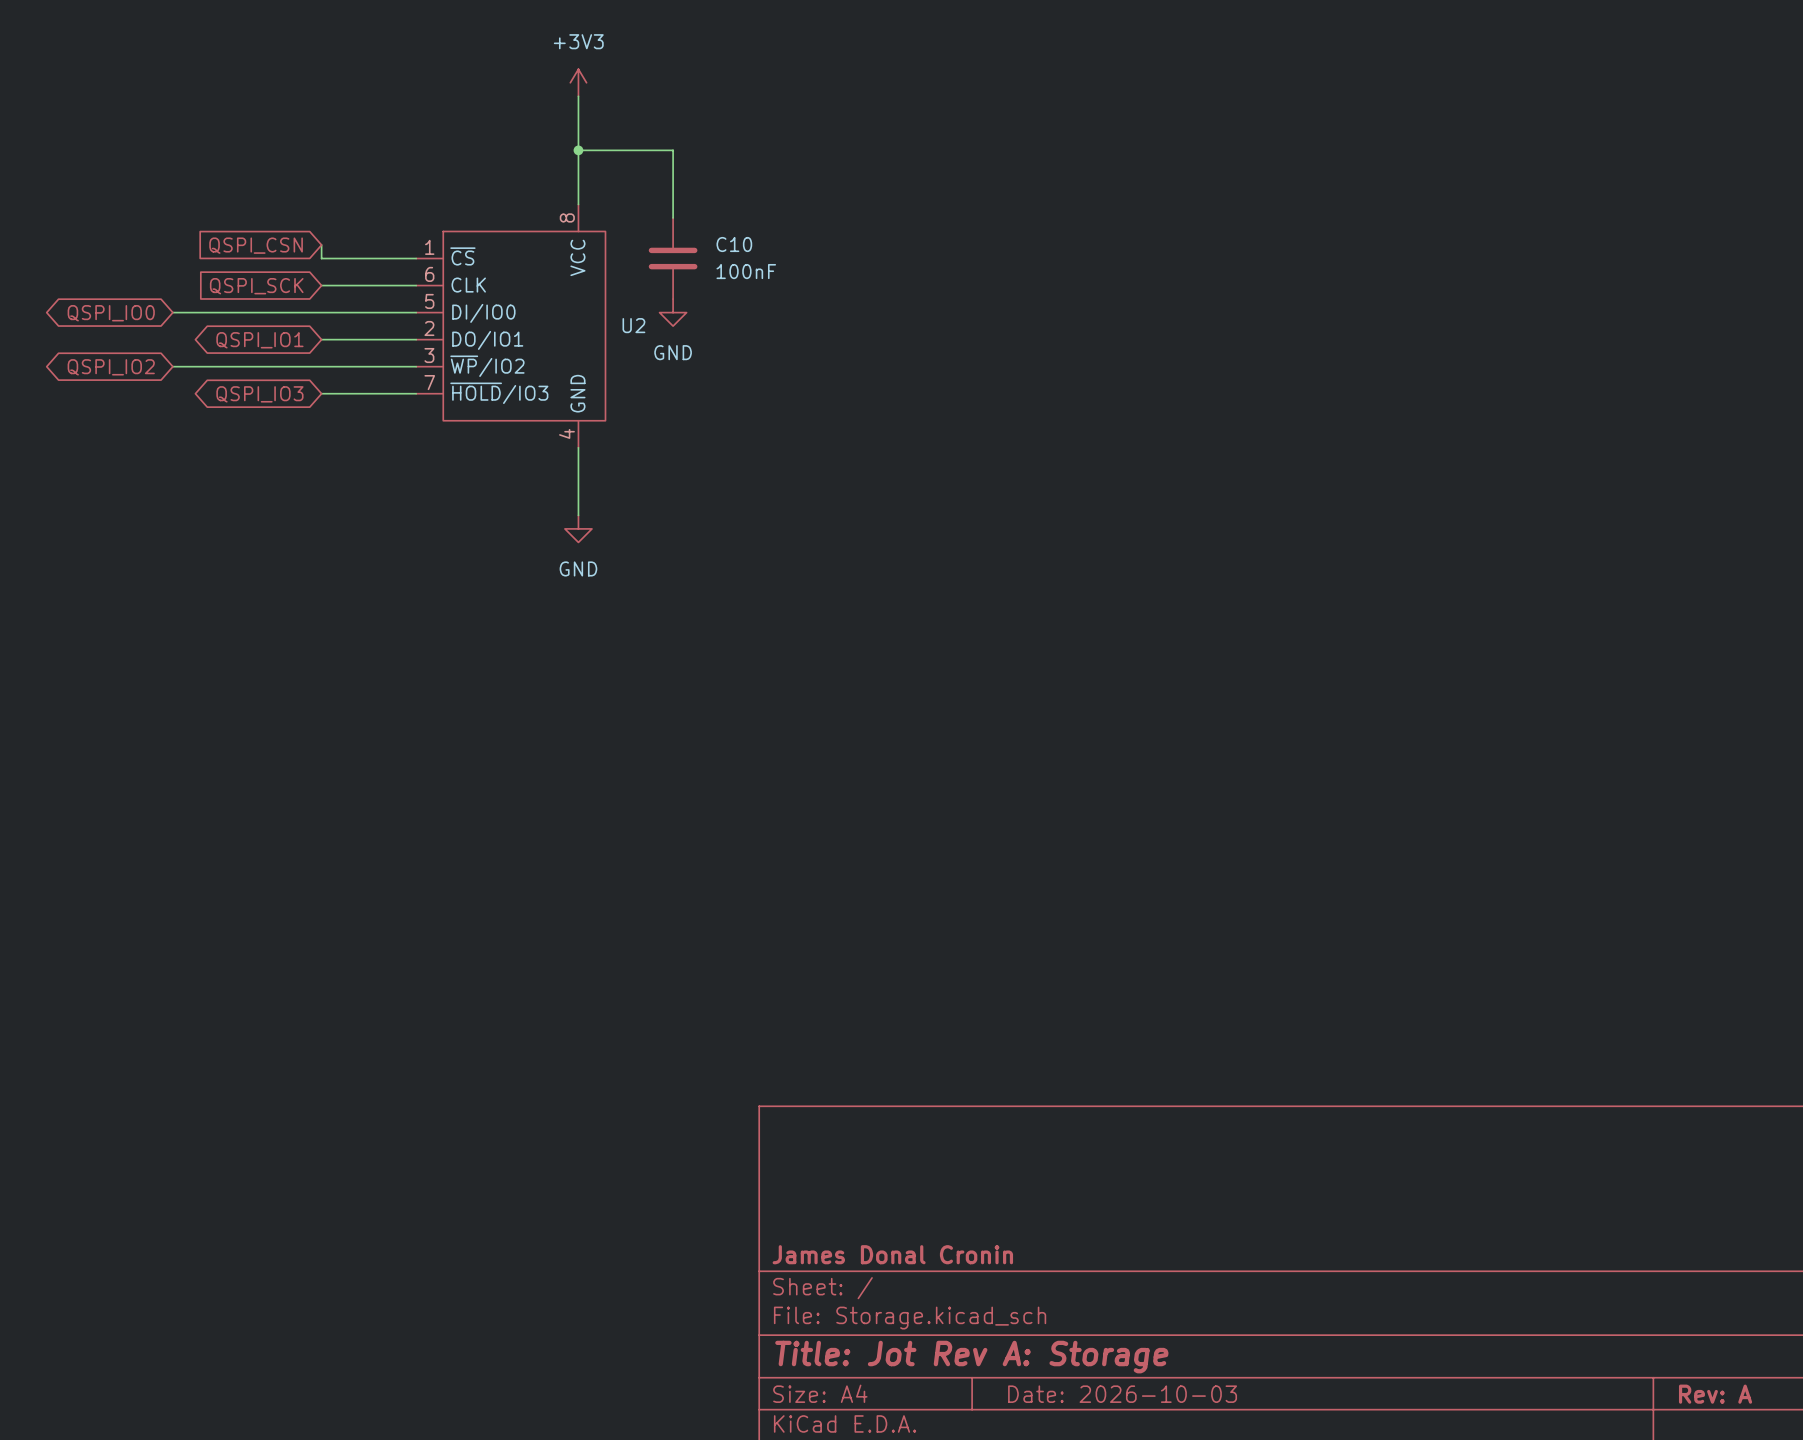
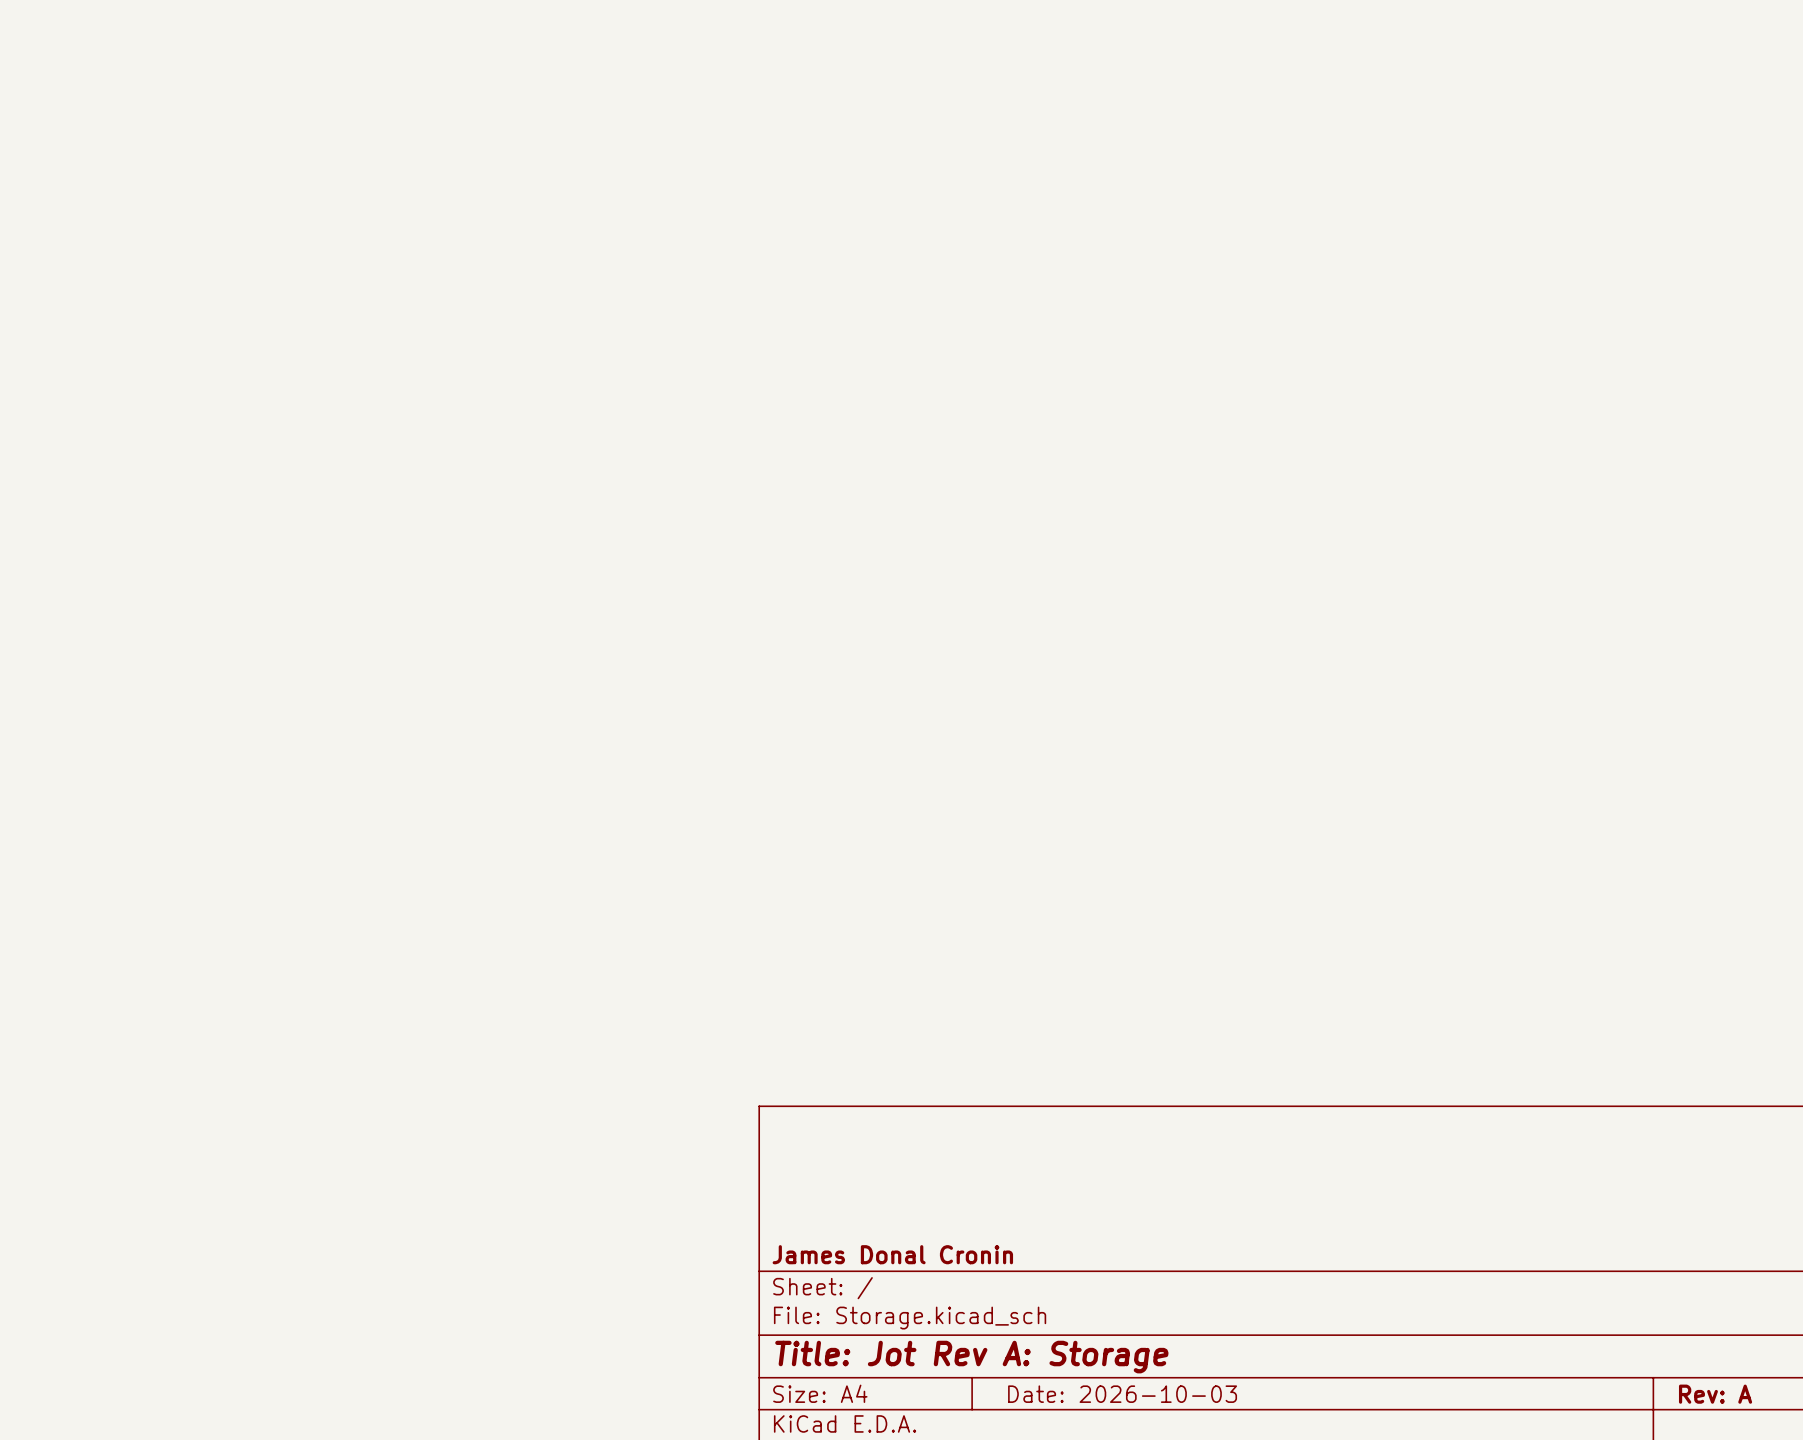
power symbol: +3V3 (578, 82) -> none
wire: (578, 96) (578, 204) -> none
wire: (578, 150) (673, 150) (673, 217) -> none
junction: (578, 150) -> none
global label: QSPI_CSN (256, 245) -> none
wire: (321, 245) (321, 258) (416, 258) -> none
C10: 100nF (673, 258) -> none
wire: (321, 285) (416, 285) -> none
global label: QSPI_SCK (256, 286) -> none
wire: (172, 312) (416, 312) -> none
power symbol: GND (673, 312) -> none
global label: QSPI_IO0 (111, 313) -> none
U2: (510, 326) -> none
wire: (321, 339) (416, 339) -> none
global label: QSPI_IO1 (259, 340) -> none
wire: (172, 366) (416, 366) -> none
global label: QSPI_IO2 (111, 367) -> none
wire: (321, 393) (416, 393) -> none
global label: QSPI_IO3 (259, 394) -> none
wire: (578, 447) (578, 515) -> none
power symbol: GND (578, 528) -> none

